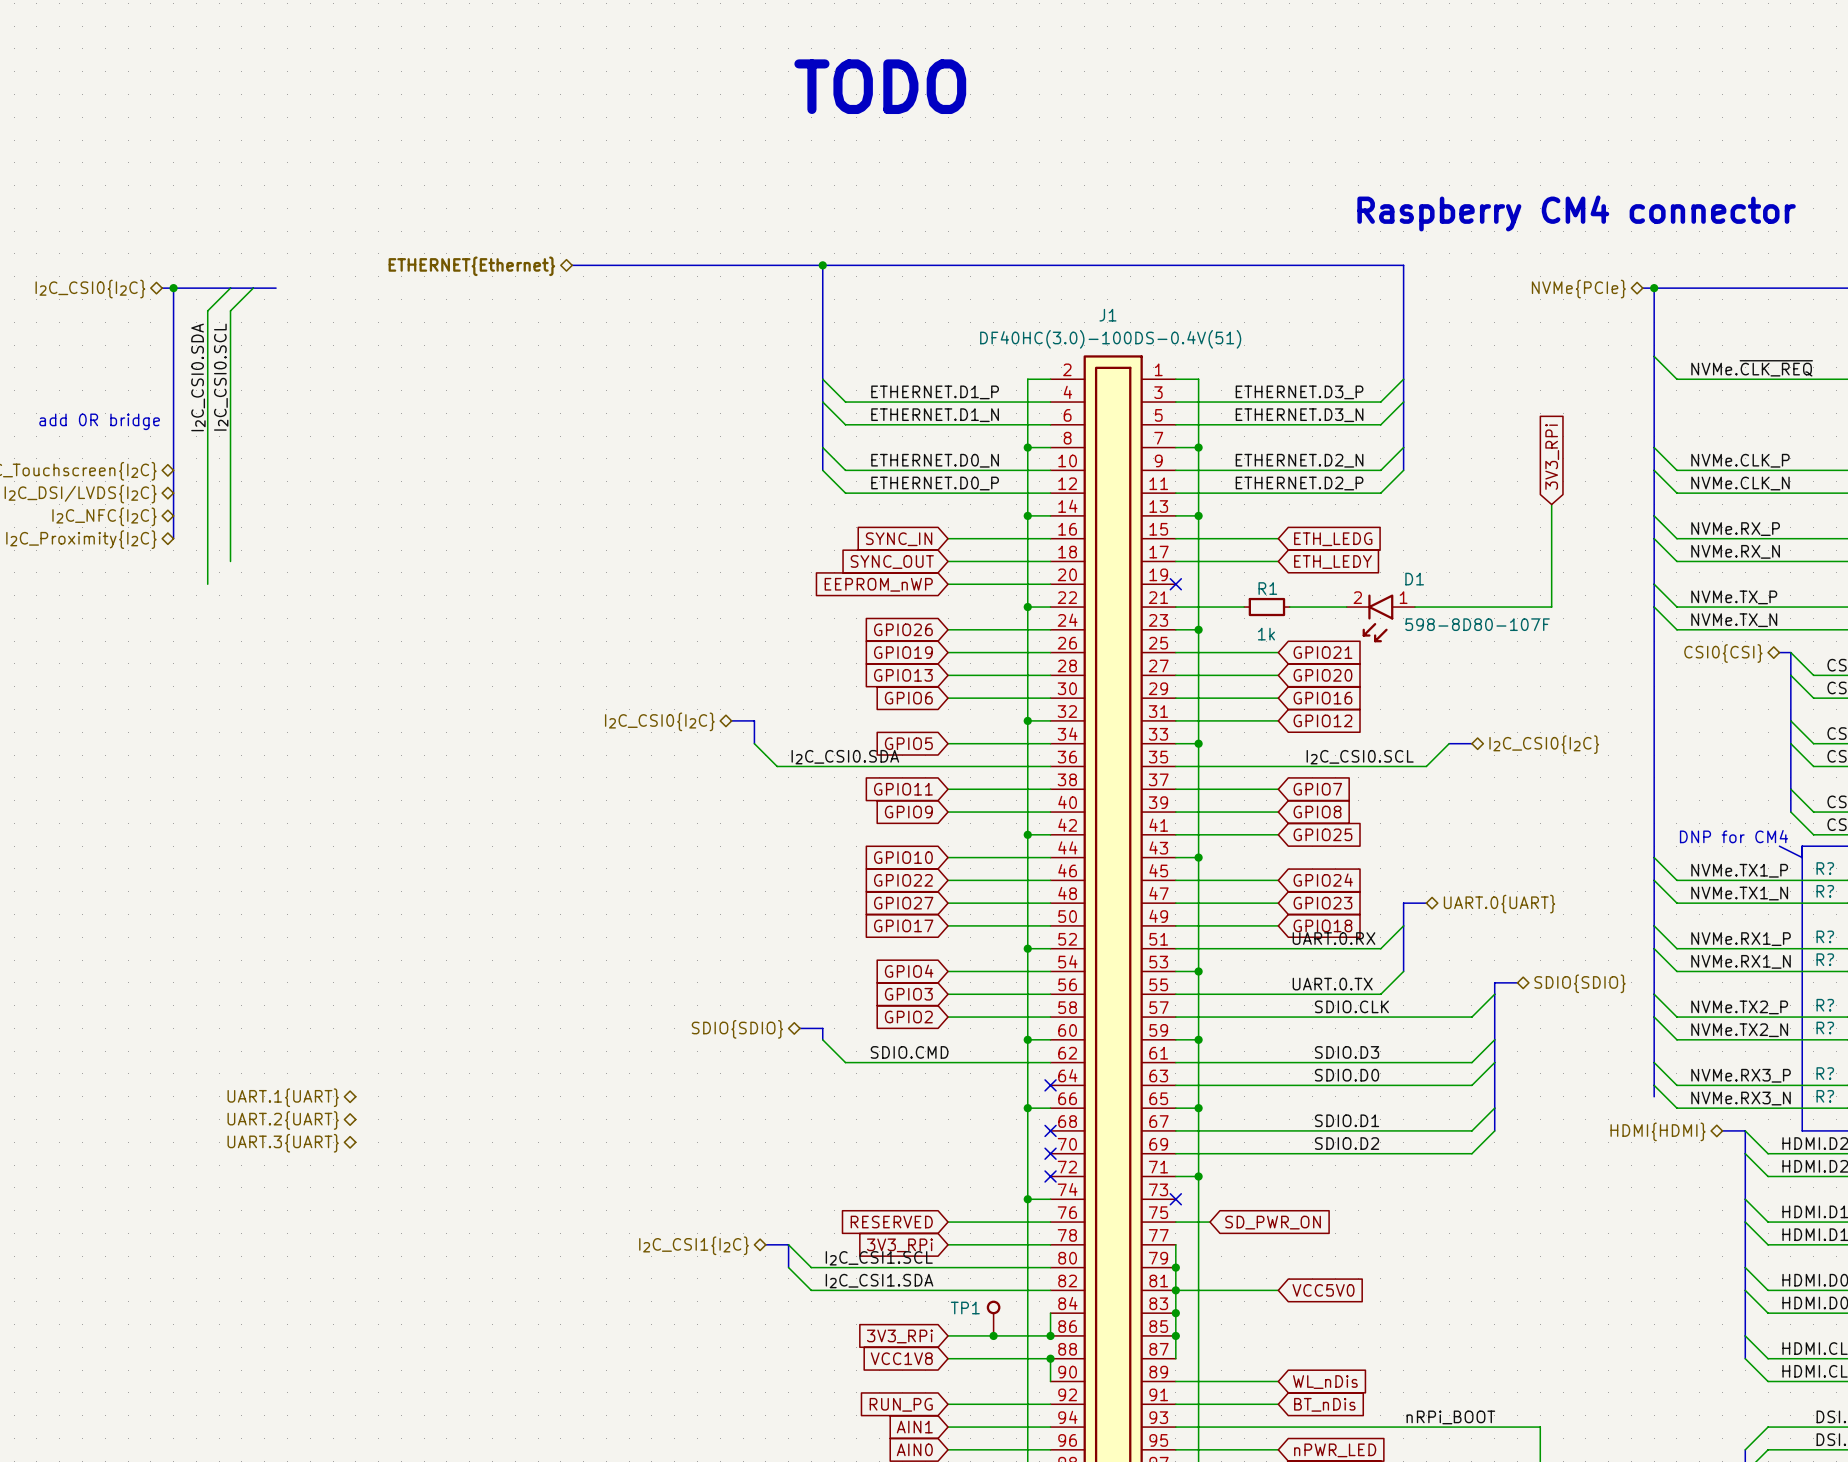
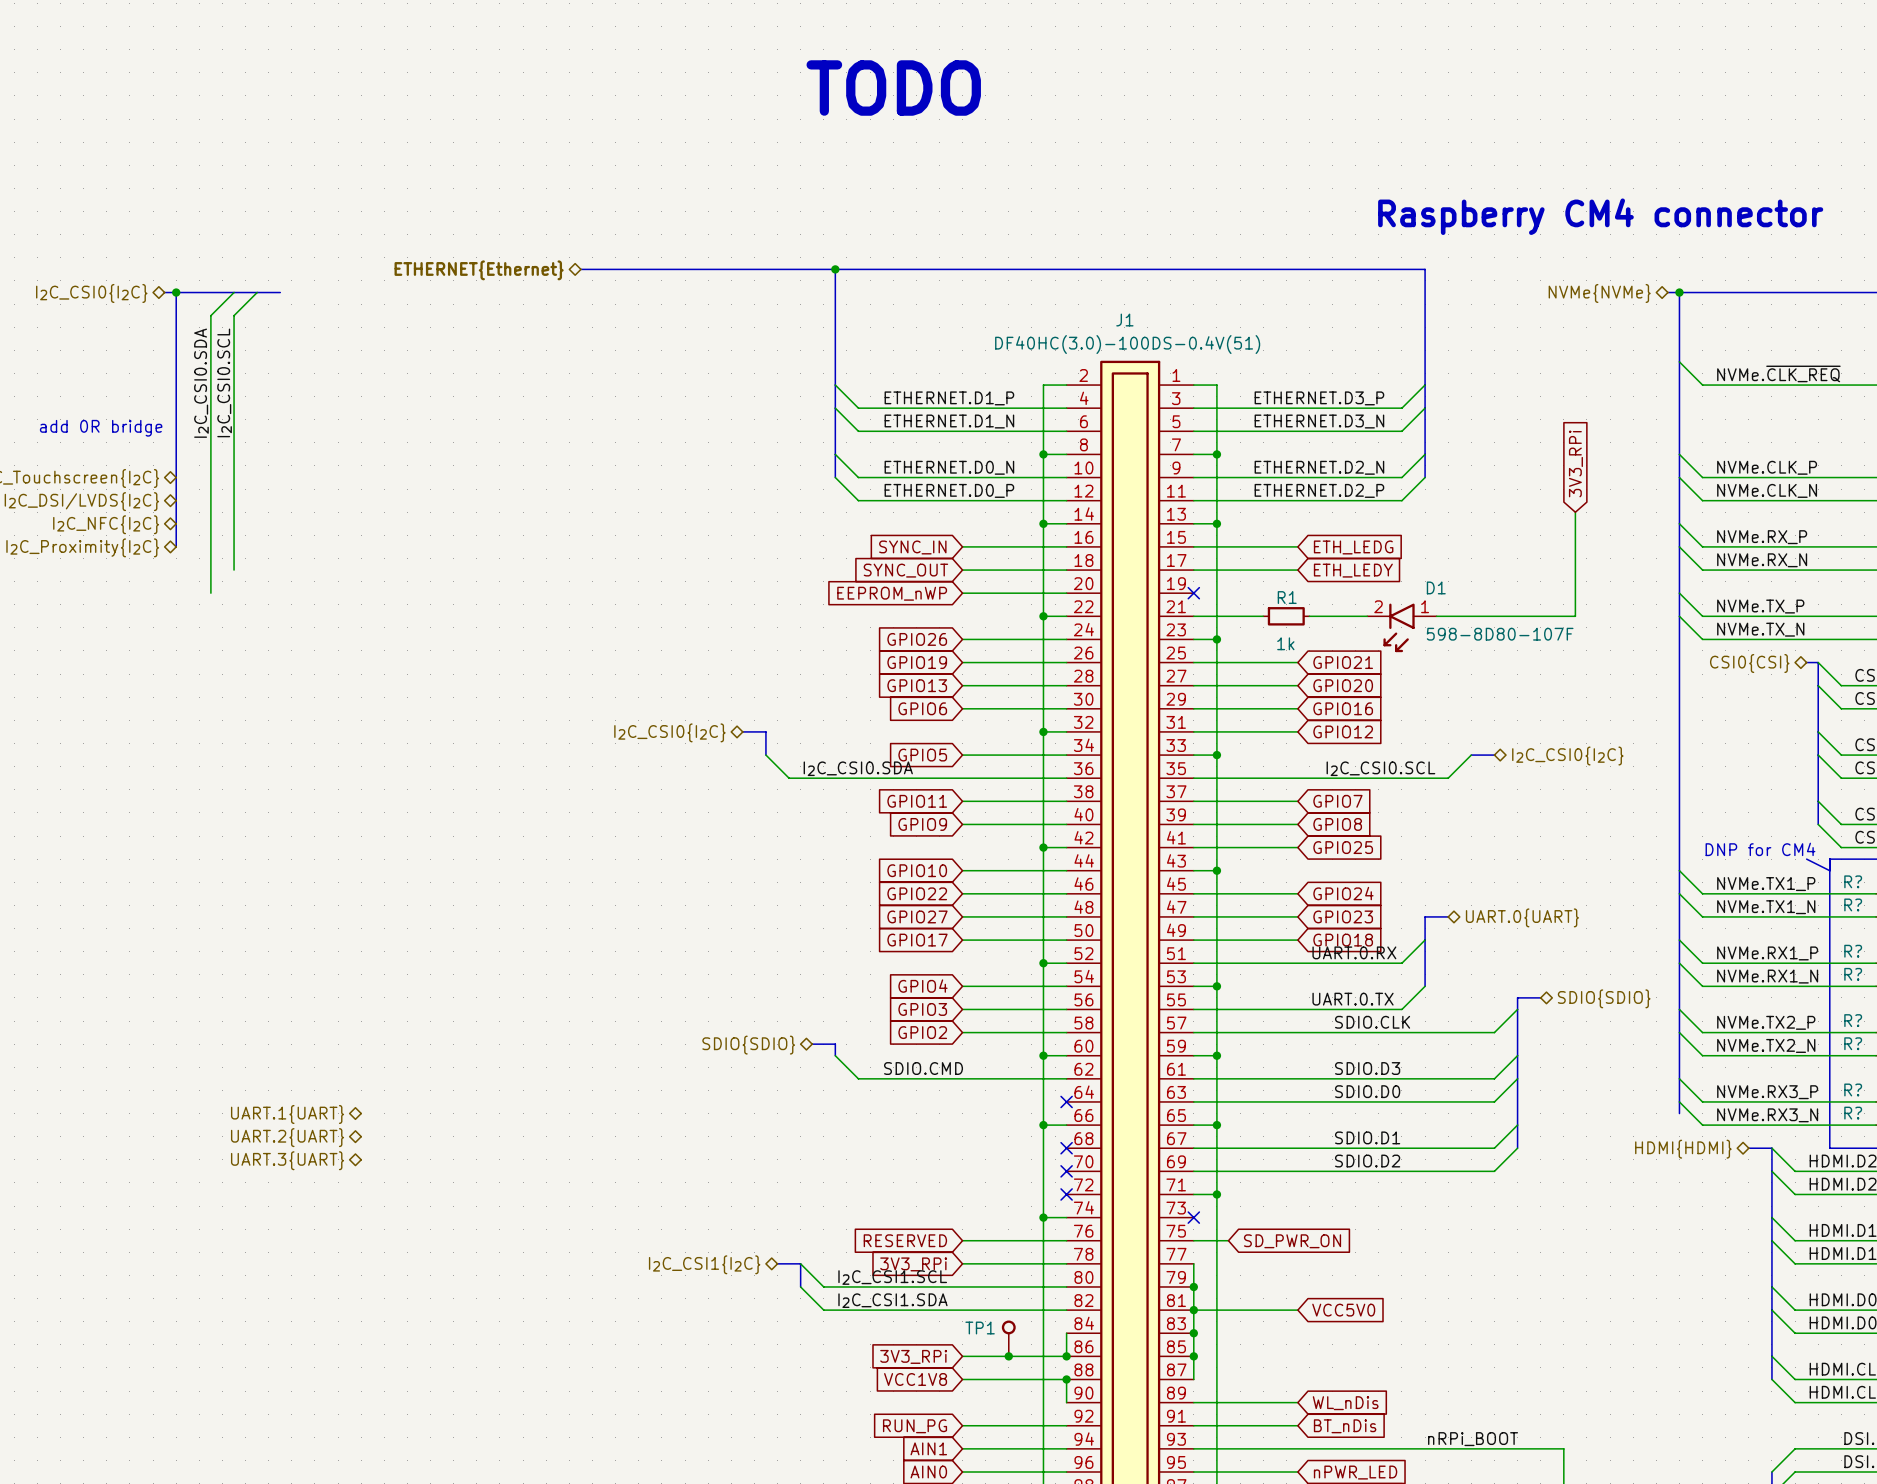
hierarchical label: NVMe{PCIe} (1578, 289) -> NVMe{NVMe} (1599, 293)

